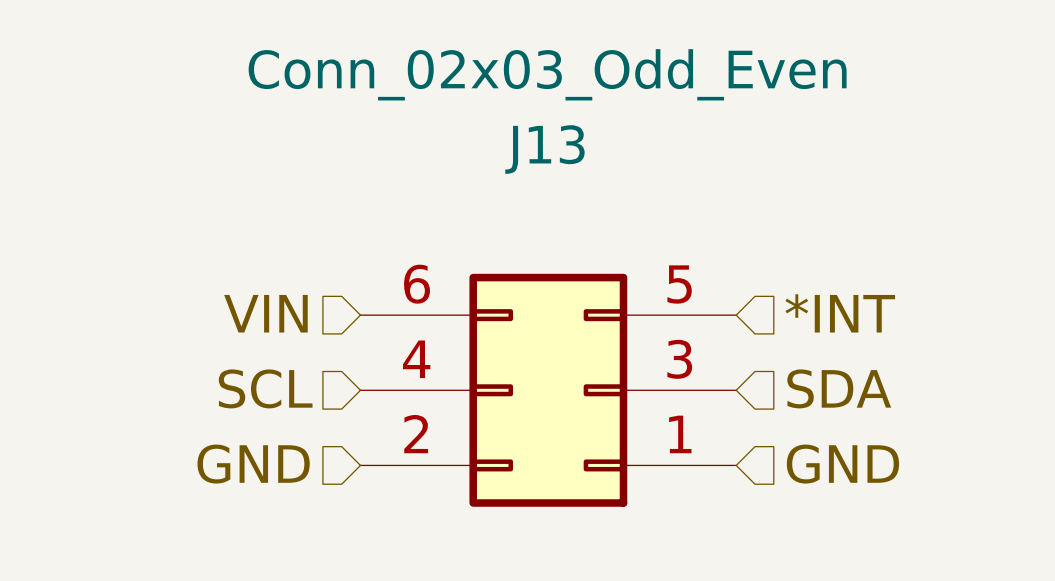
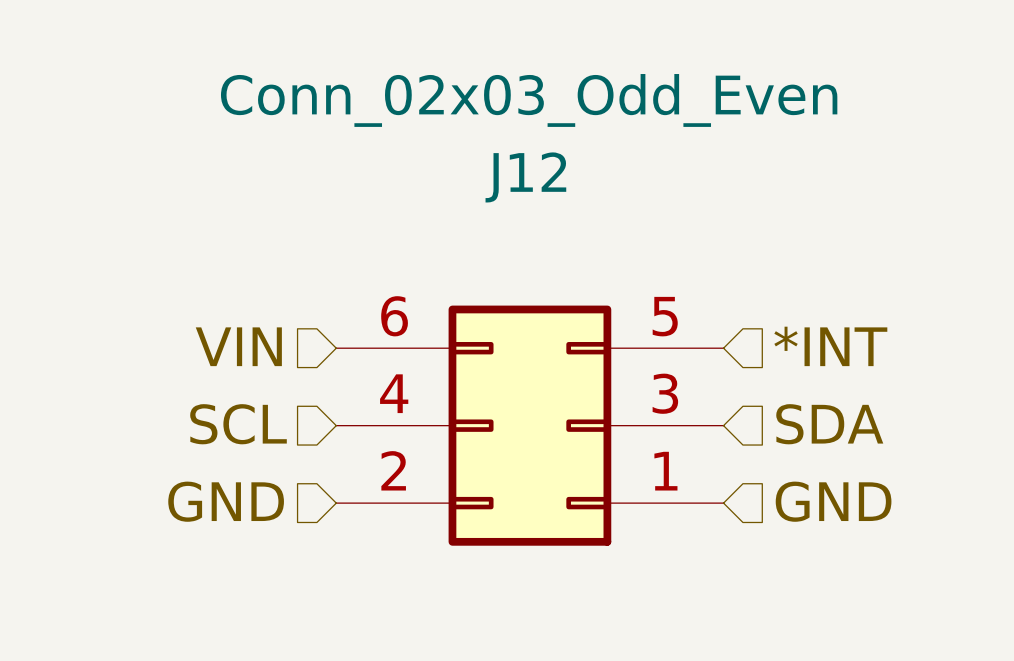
J13 name: J13 (544, 149) -> J12 (525, 177)

